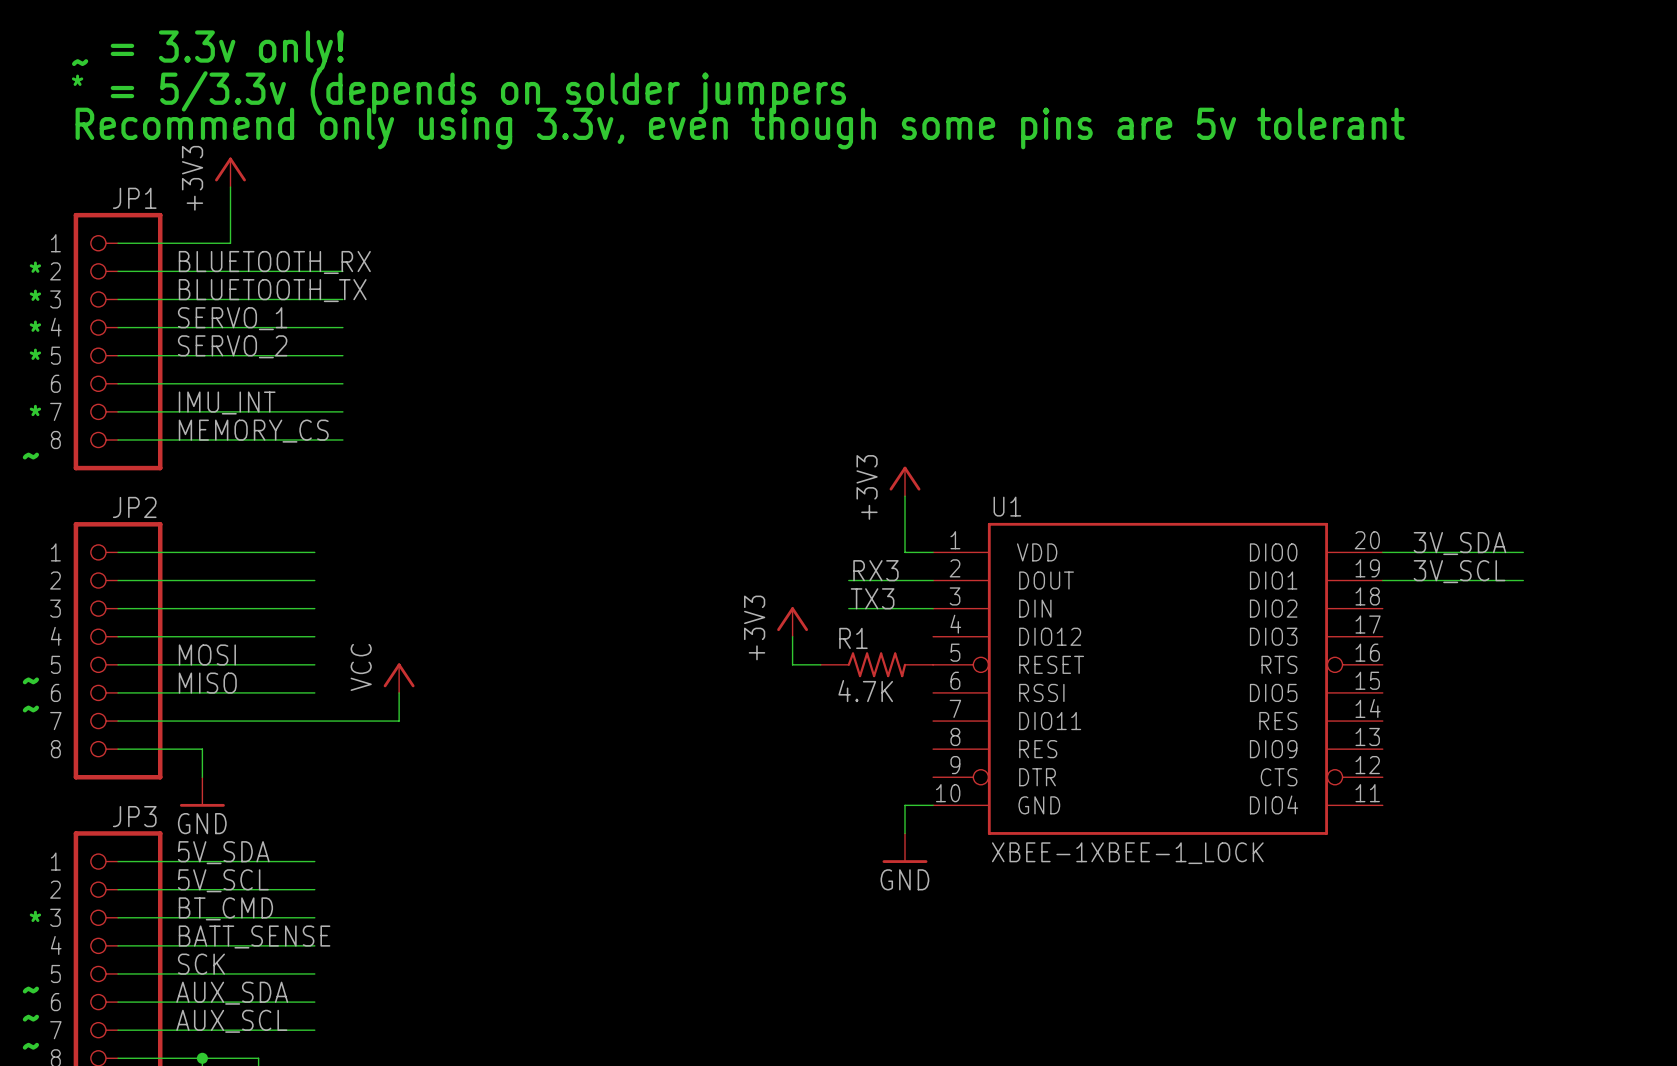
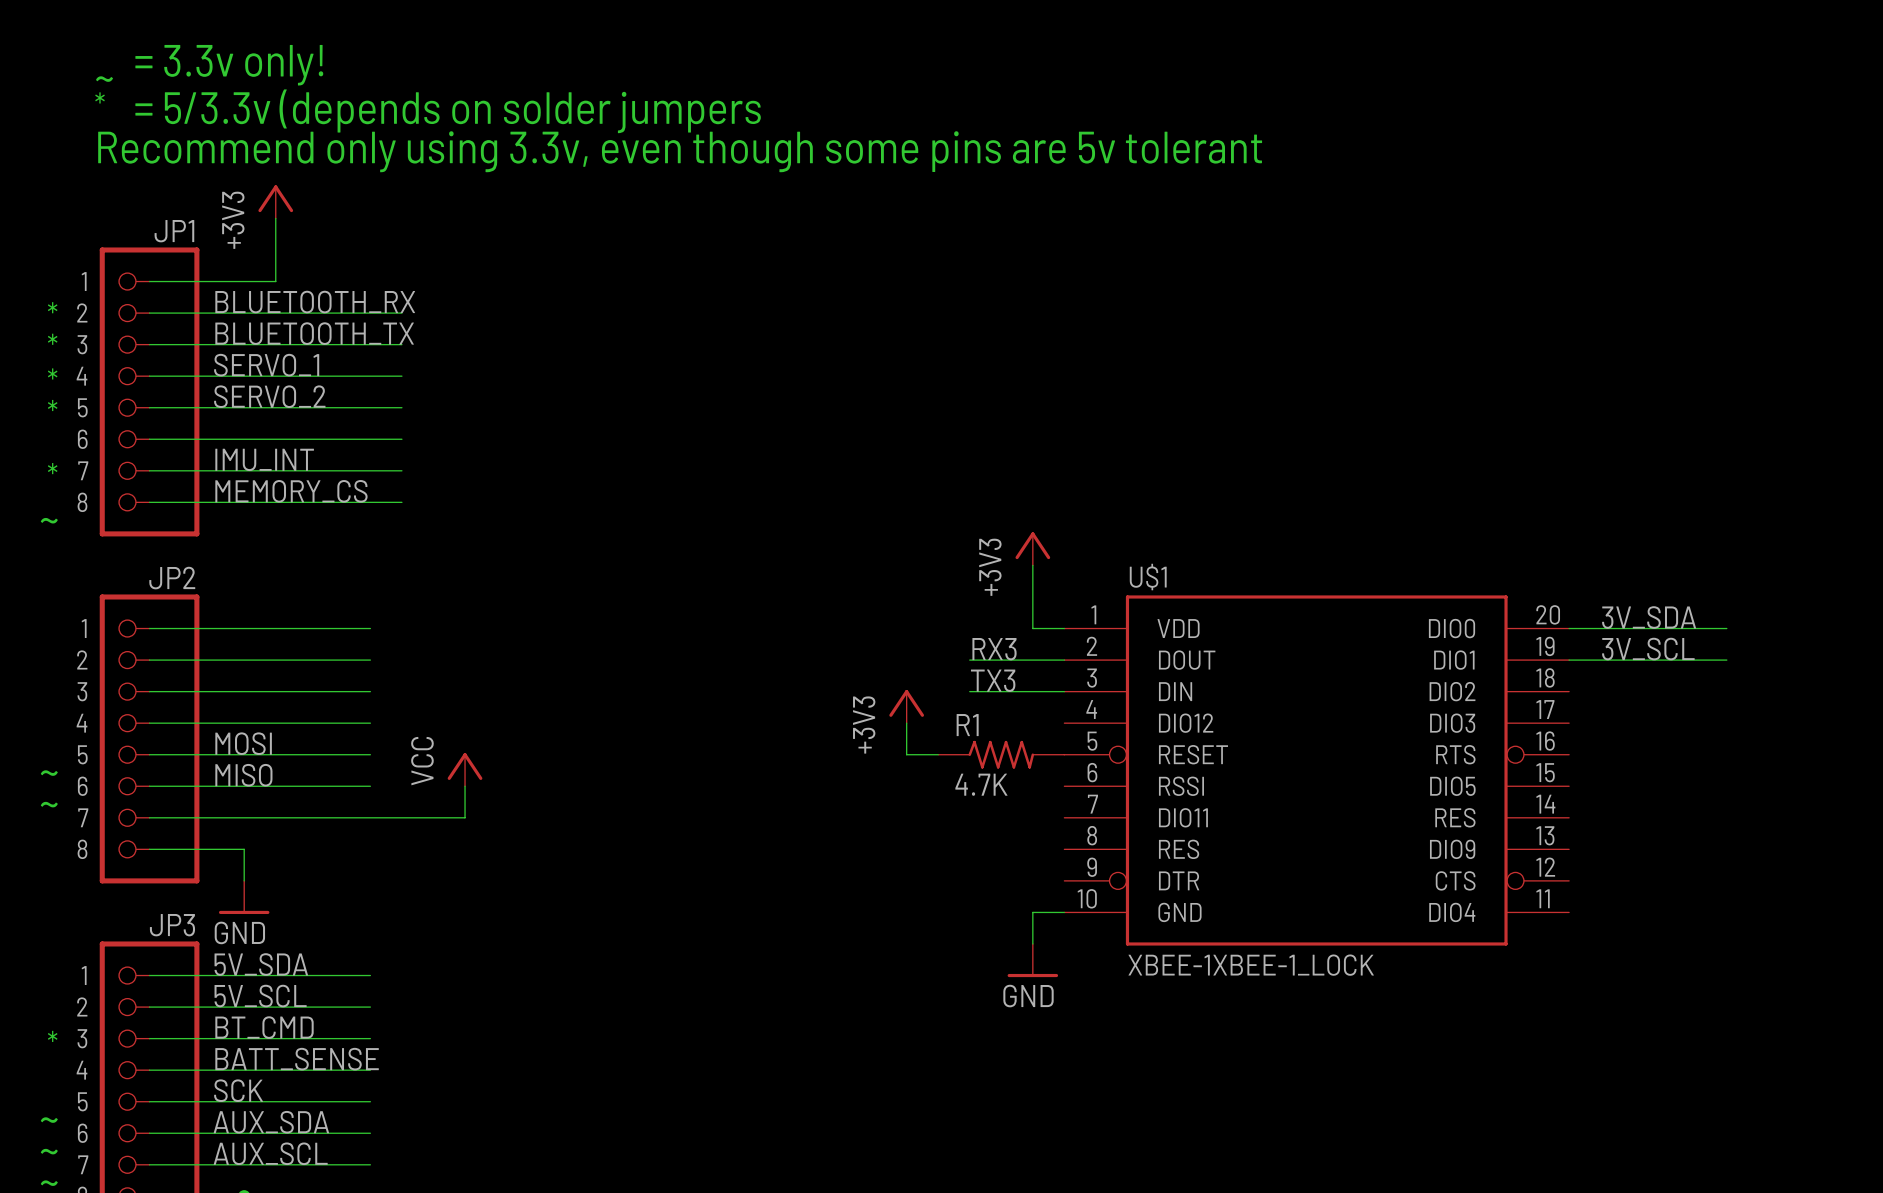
U1 name: U1 (1007, 506) -> U$1 (1148, 577)

